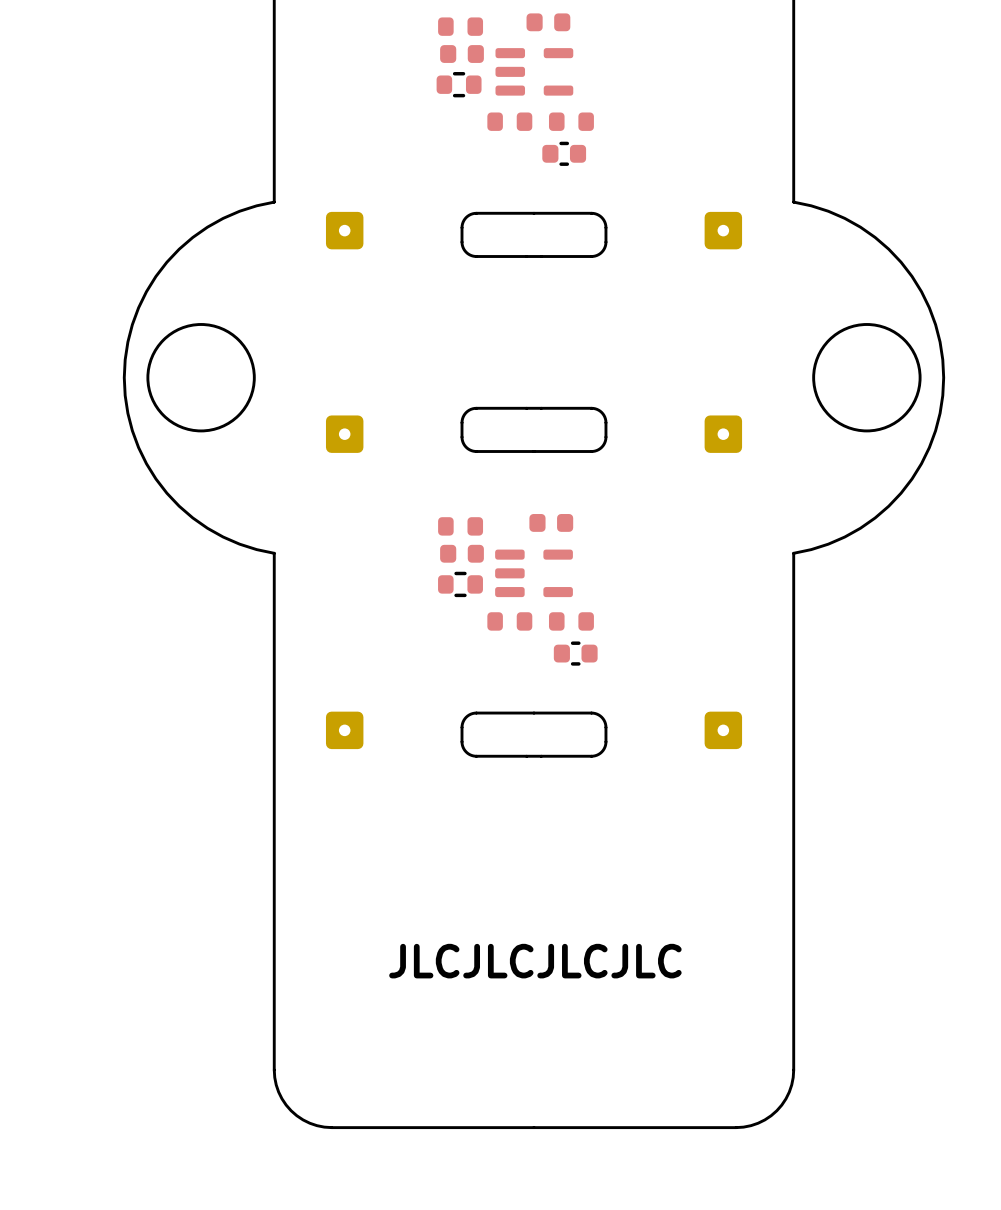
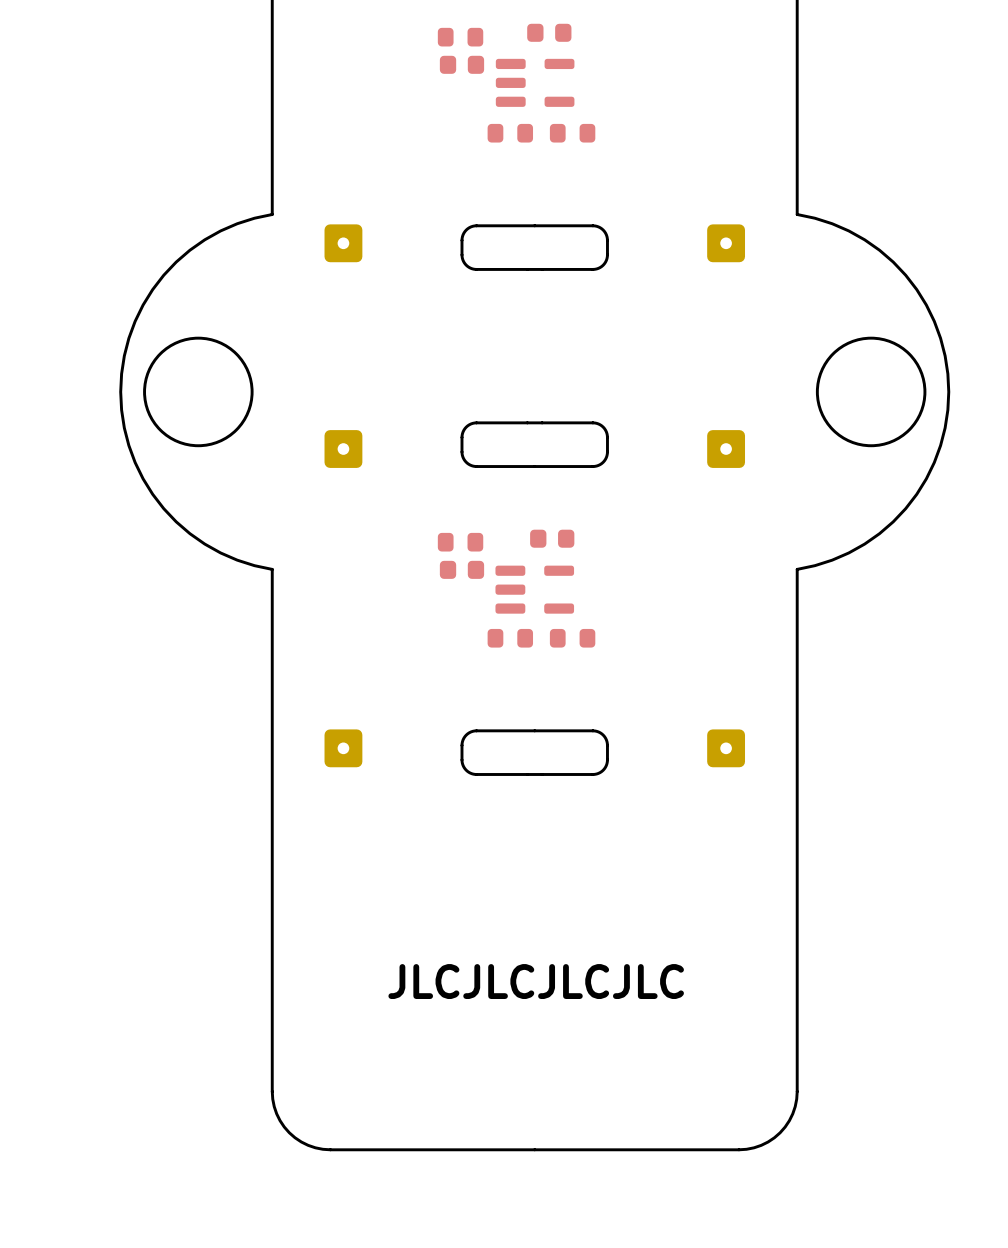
part: (459, 84) -> none
part: (564, 153) -> none
part: (460, 584) -> none
part: (575, 653) -> none

